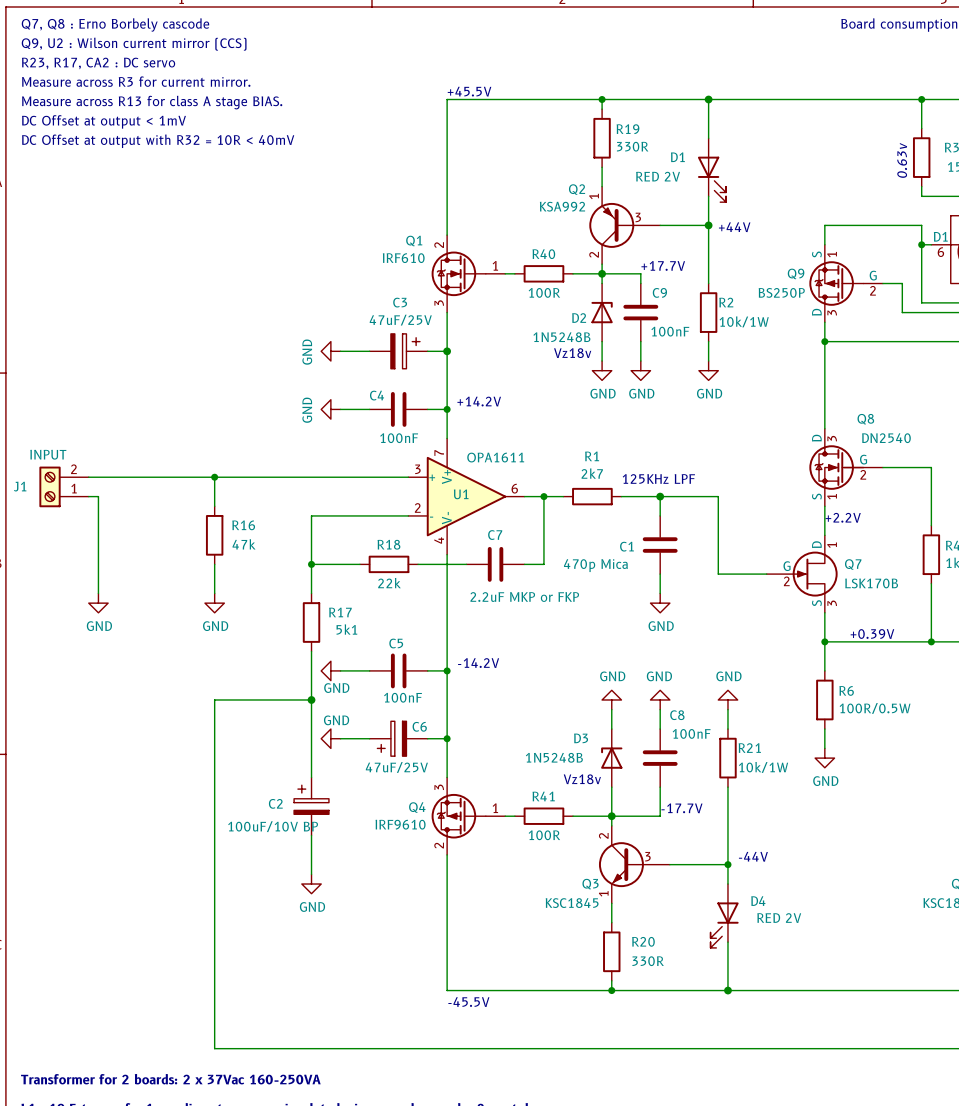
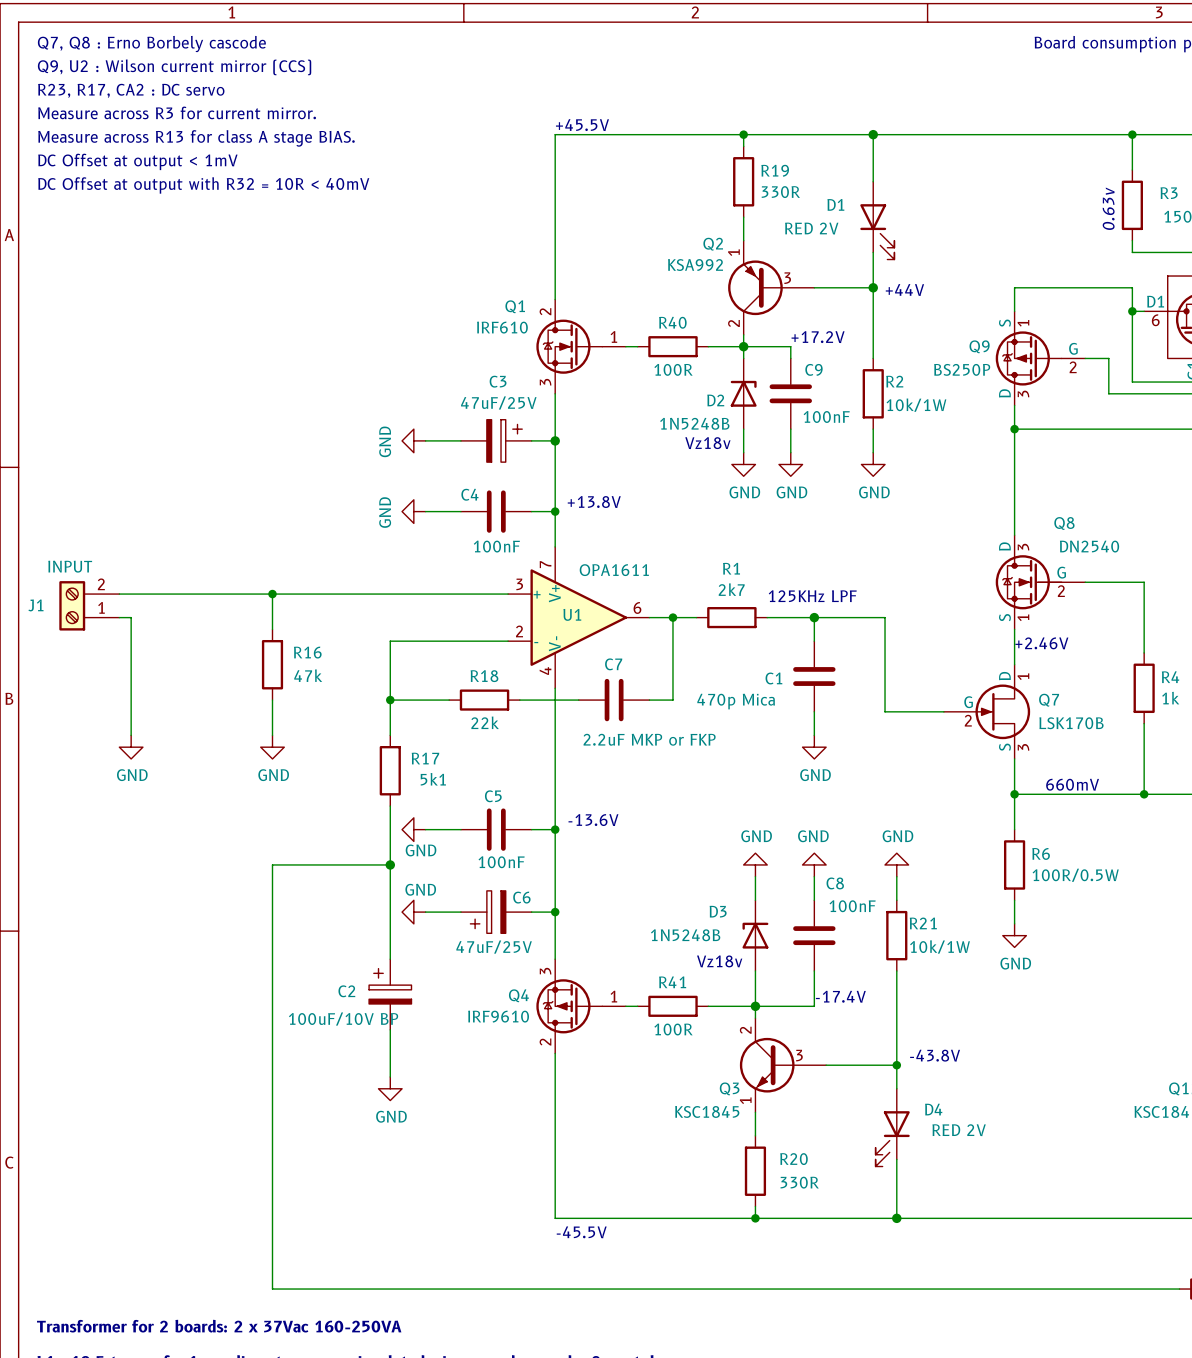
text: +17.7V (663, 265) -> +17.2V (818, 337)
text: +14.2V (479, 401) -> +13.8V (594, 502)
text: +2.2V (843, 517) -> +2.46V (1041, 643)
text: +0.39V (872, 634) -> 660mV (1072, 784)
text: -14.2V (478, 663) -> -13.6V (593, 820)
text: -17.7V (681, 808) -> -17.4V (840, 996)
text: -44V (753, 856) -> -43.8V (935, 1055)

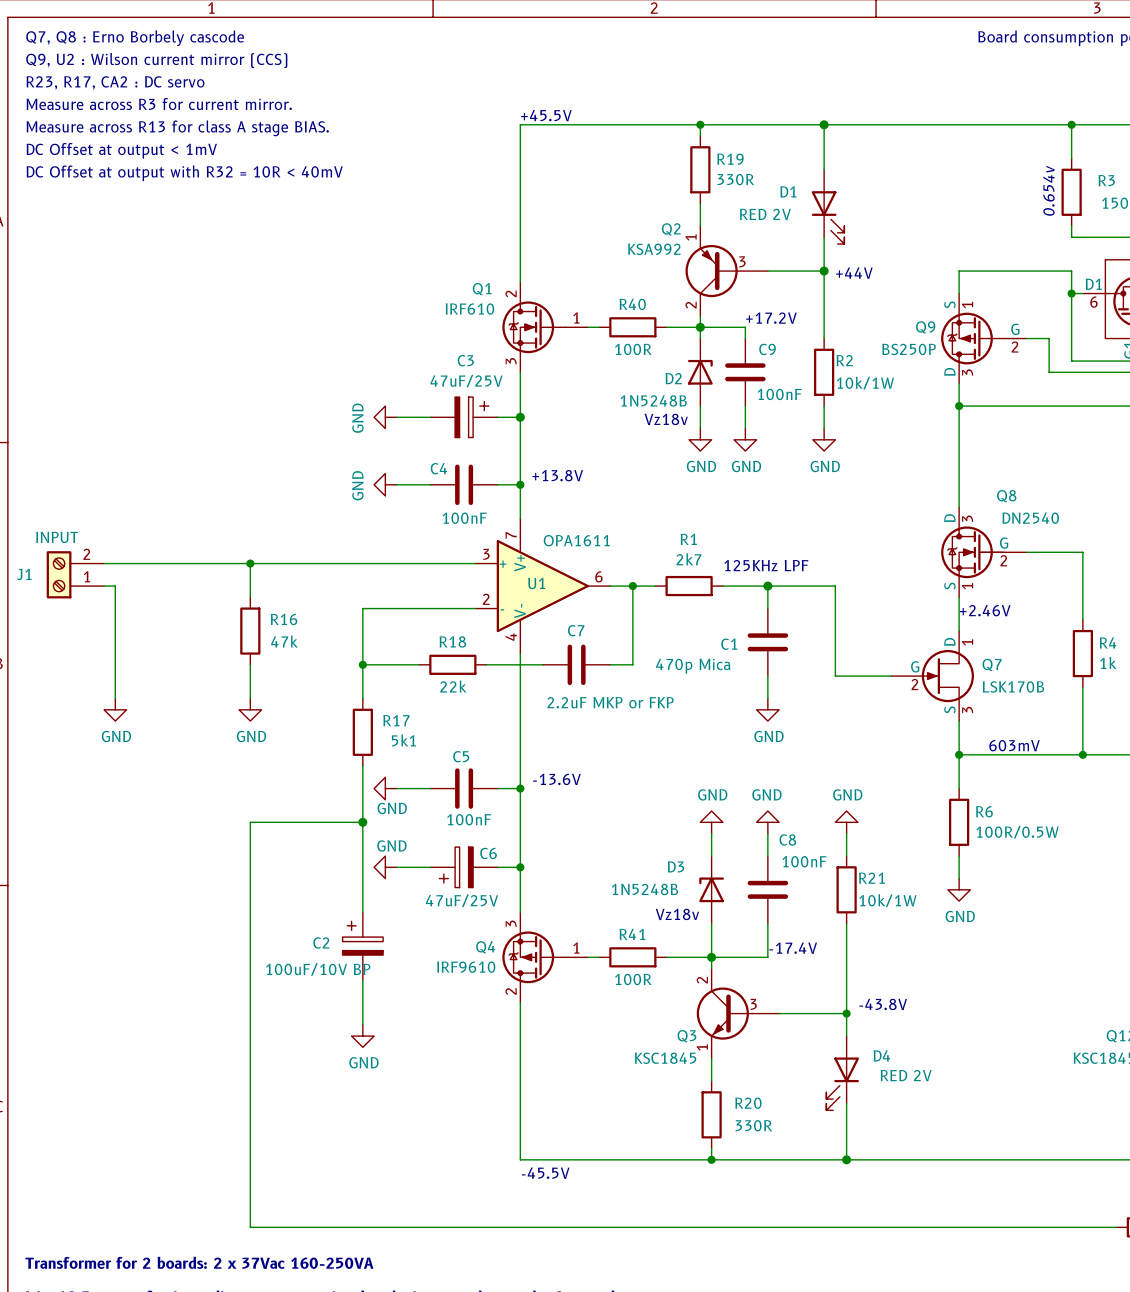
text: 0.63v (1108, 208) -> 0.654v (1048, 190)
text: 660mV (1072, 784) -> 603mV (1014, 745)

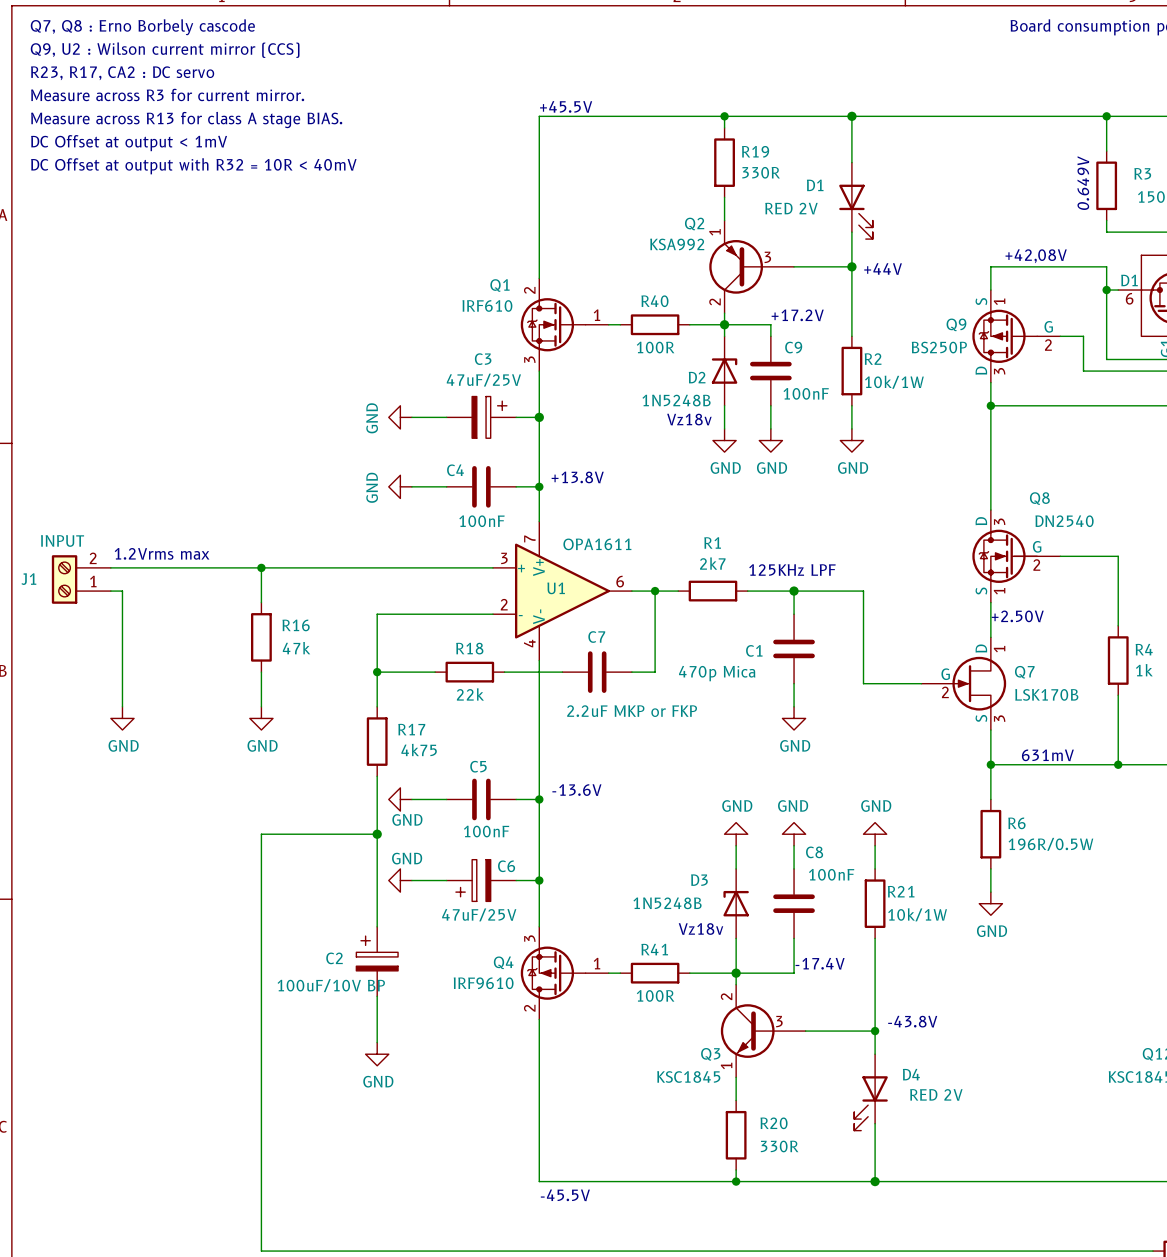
text: 0.654v (1048, 190) -> 0.649V (1083, 183)
text: none -> +42,08V (1036, 256)
text: none -> 1.2Vrms max (162, 553)
text: +2.46V (985, 610) -> +2.50V (1017, 616)
R17 value: 5k1 (403, 740) -> 4k75 (419, 749)
text: 603mV (1014, 745) -> 631mV (1047, 755)
R6 value: 100R/0.5W (1017, 832) -> 196R/0.5W (1050, 844)

